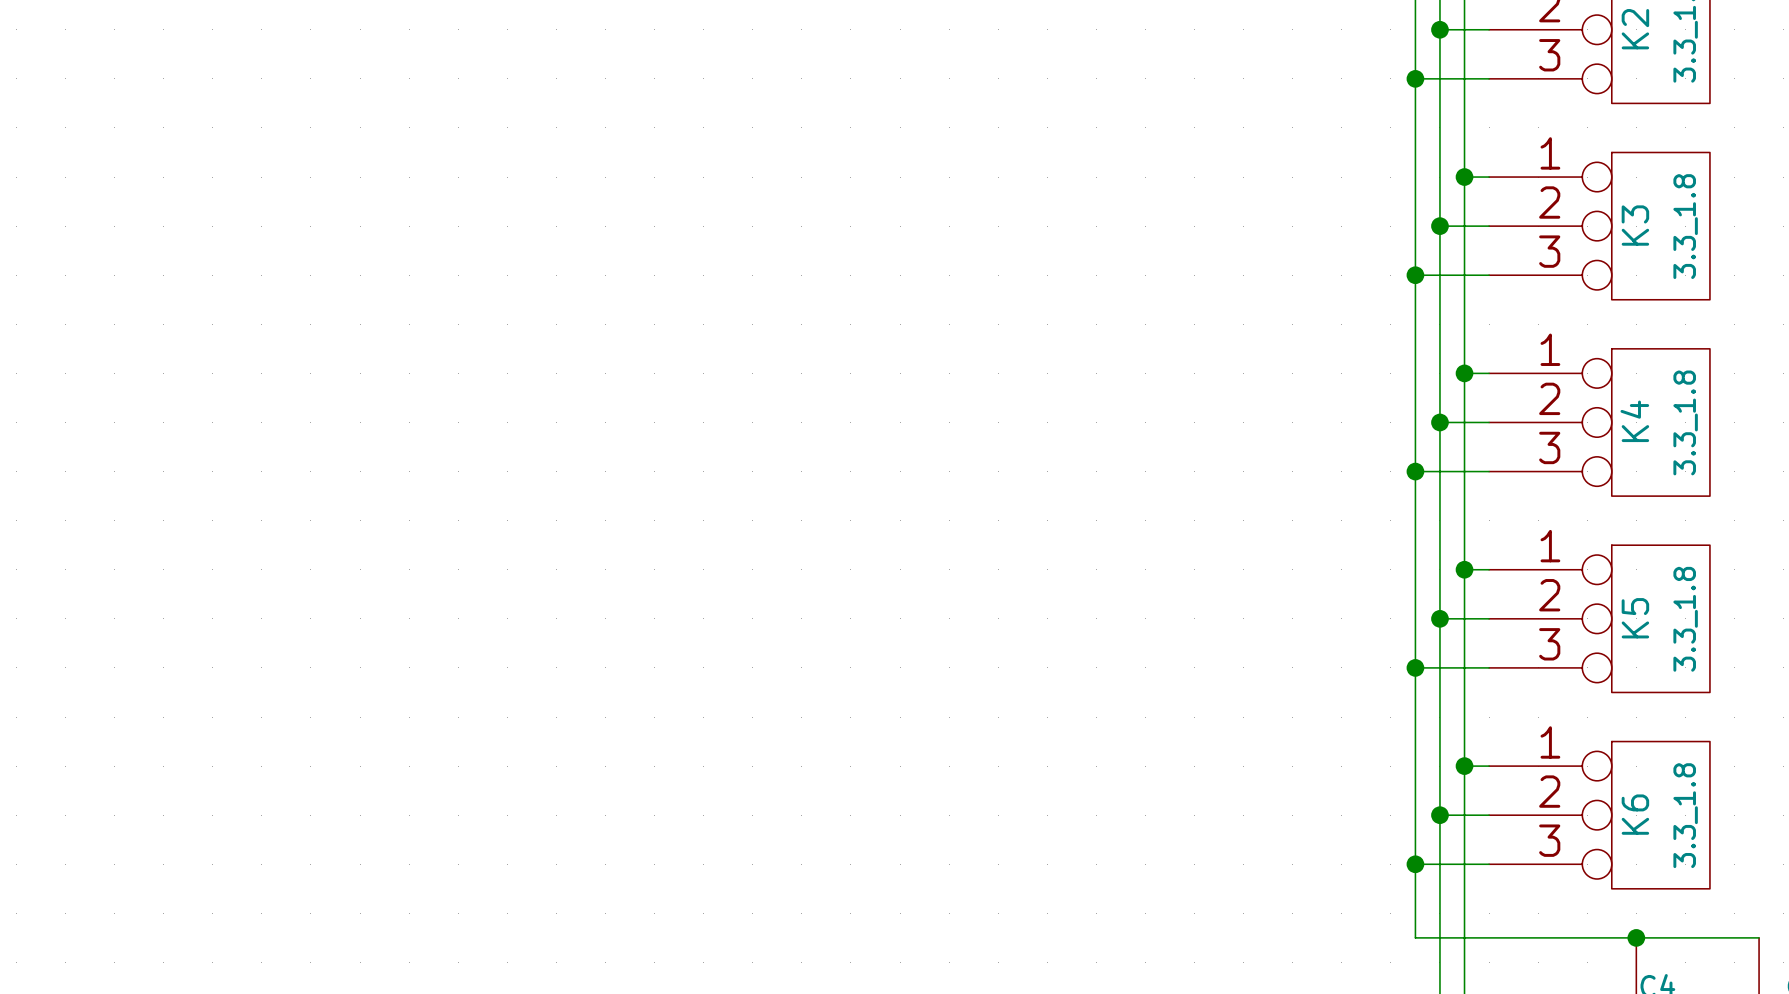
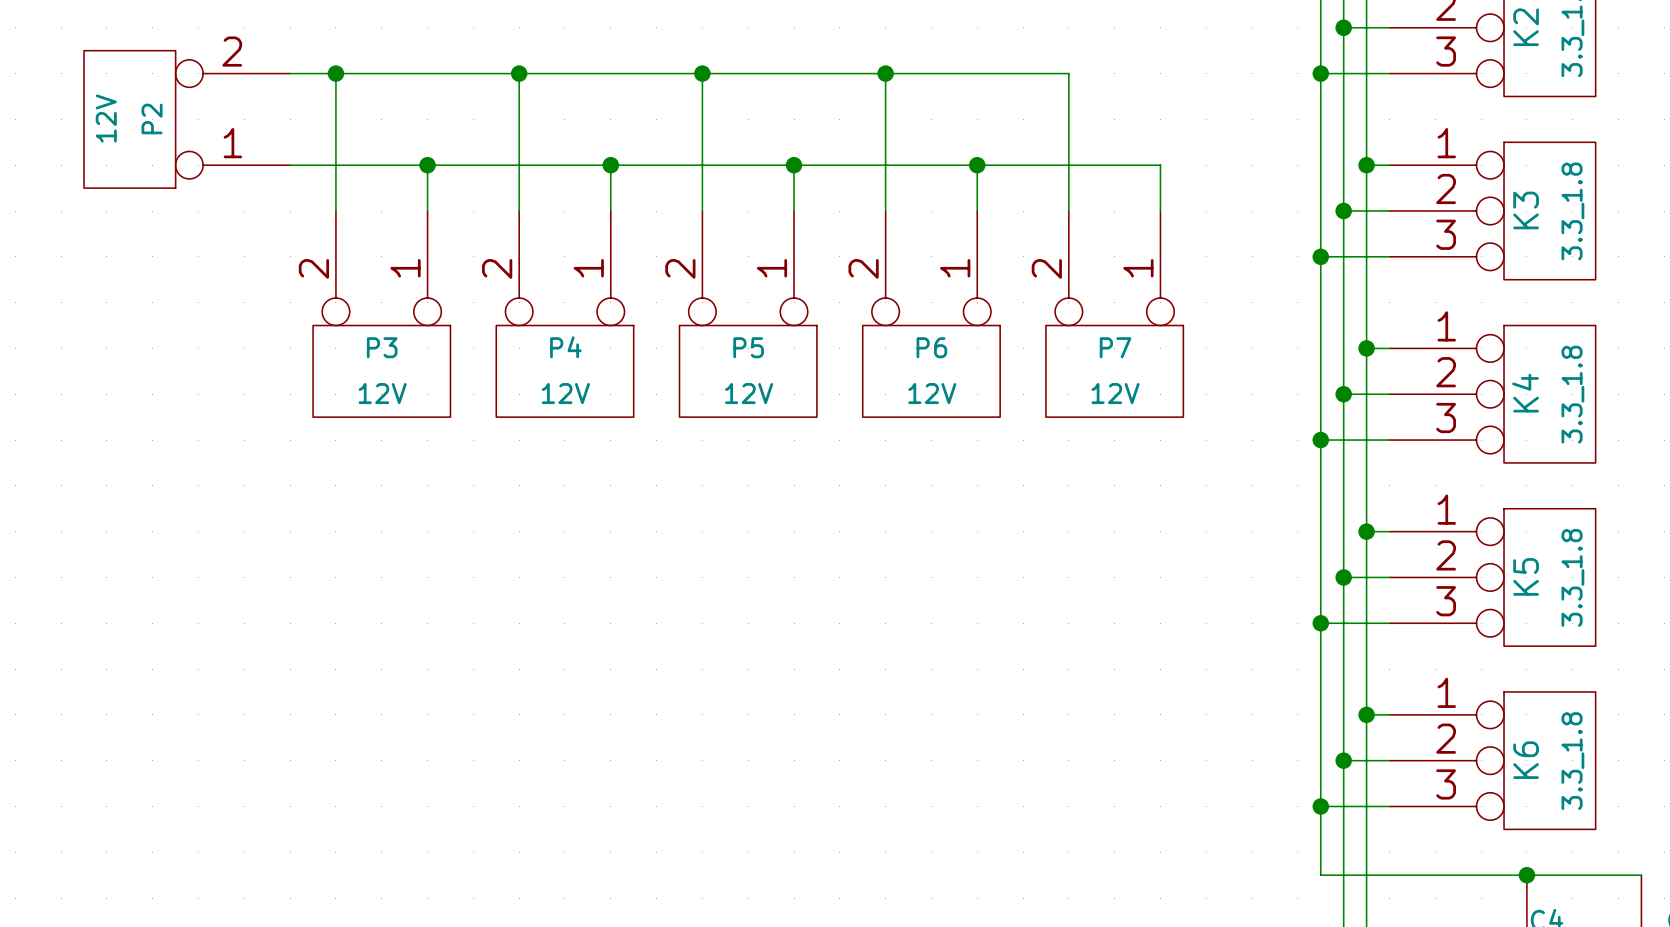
wire: none -> (290, 73) (1068, 73) (1068, 211)
wire: none -> (335, 73) (335, 211)
junction: none -> (335, 73)
wire: none -> (519, 73) (519, 211)
junction: none -> (519, 73)
wire: none -> (702, 73) (702, 211)
junction: none -> (702, 73)
wire: none -> (885, 73) (885, 211)
junction: none -> (885, 73)
P2: none -> 12V (187, 119)
wire: none -> (290, 165) (1160, 165) (1160, 211)
wire: none -> (427, 165) (427, 211)
junction: none -> (427, 165)
wire: none -> (610, 165) (610, 211)
junction: none -> (610, 165)
wire: none -> (794, 165) (794, 211)
junction: none -> (794, 165)
wire: none -> (977, 165) (977, 211)
junction: none -> (977, 165)
P3: none -> 12V (381, 314)
P4: none -> 12V (564, 314)
P5: none -> 12V (748, 314)
P6: none -> 12V (931, 314)
P7: none -> 12V (1114, 314)

